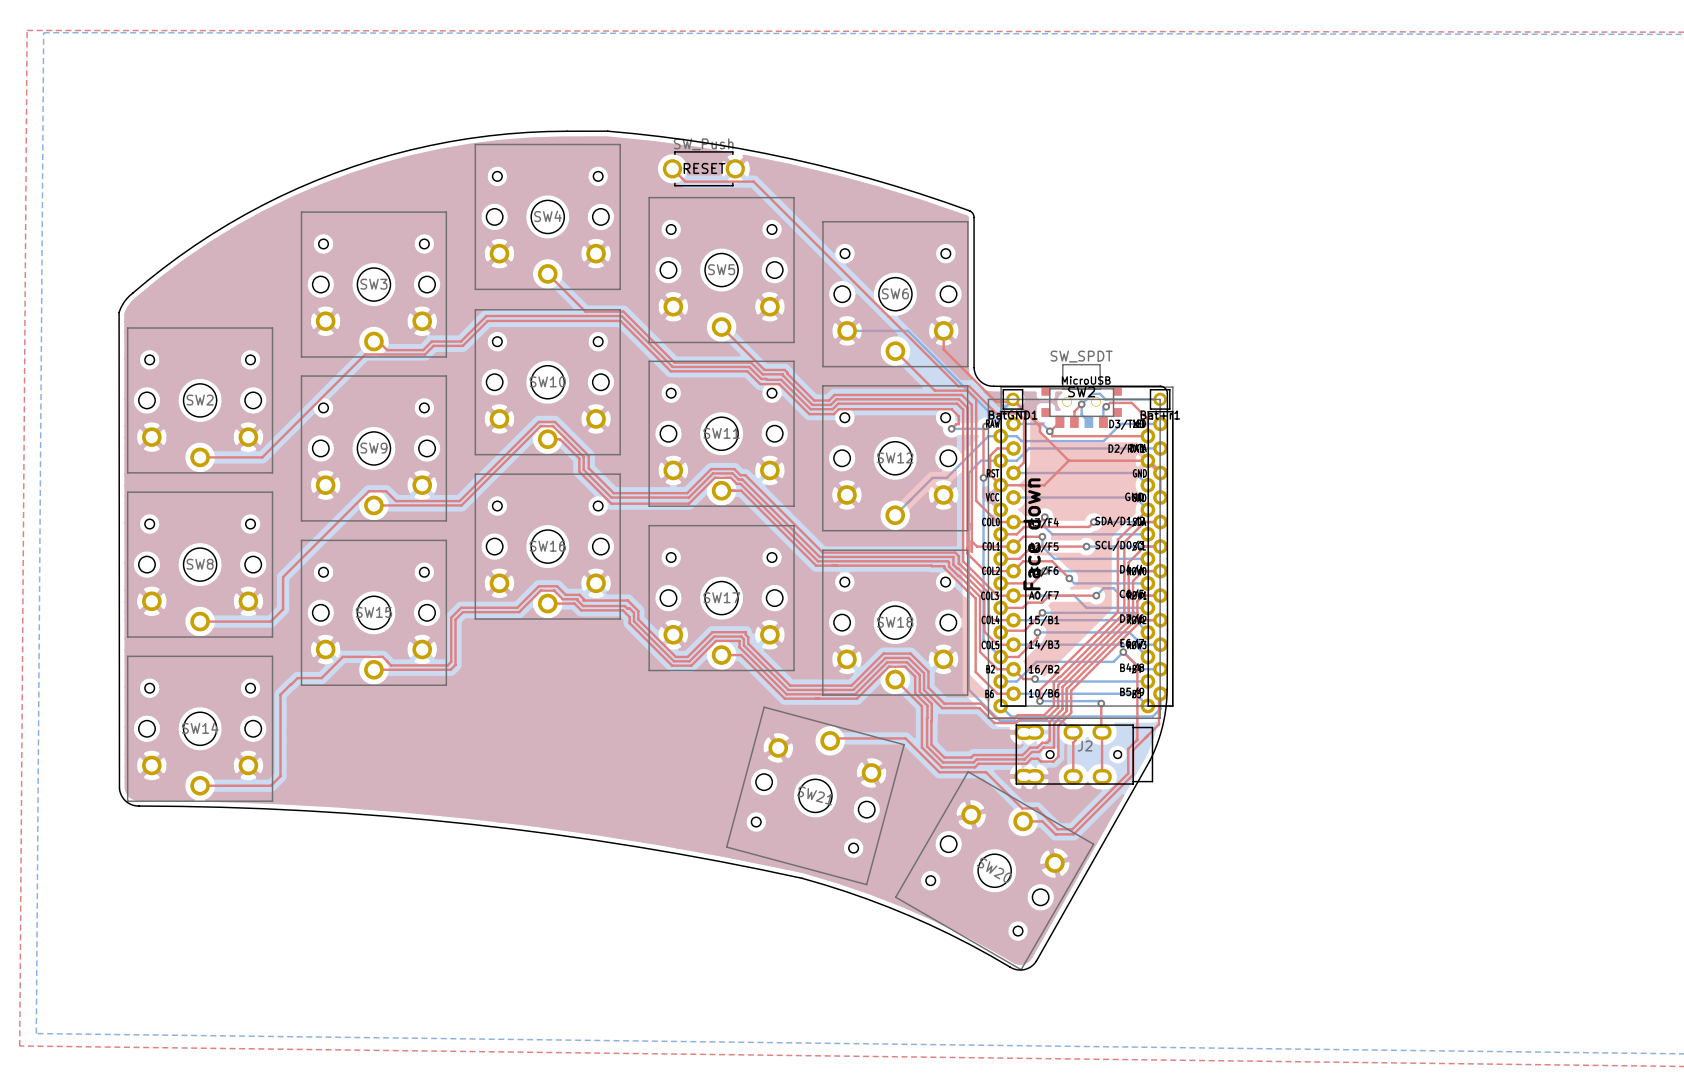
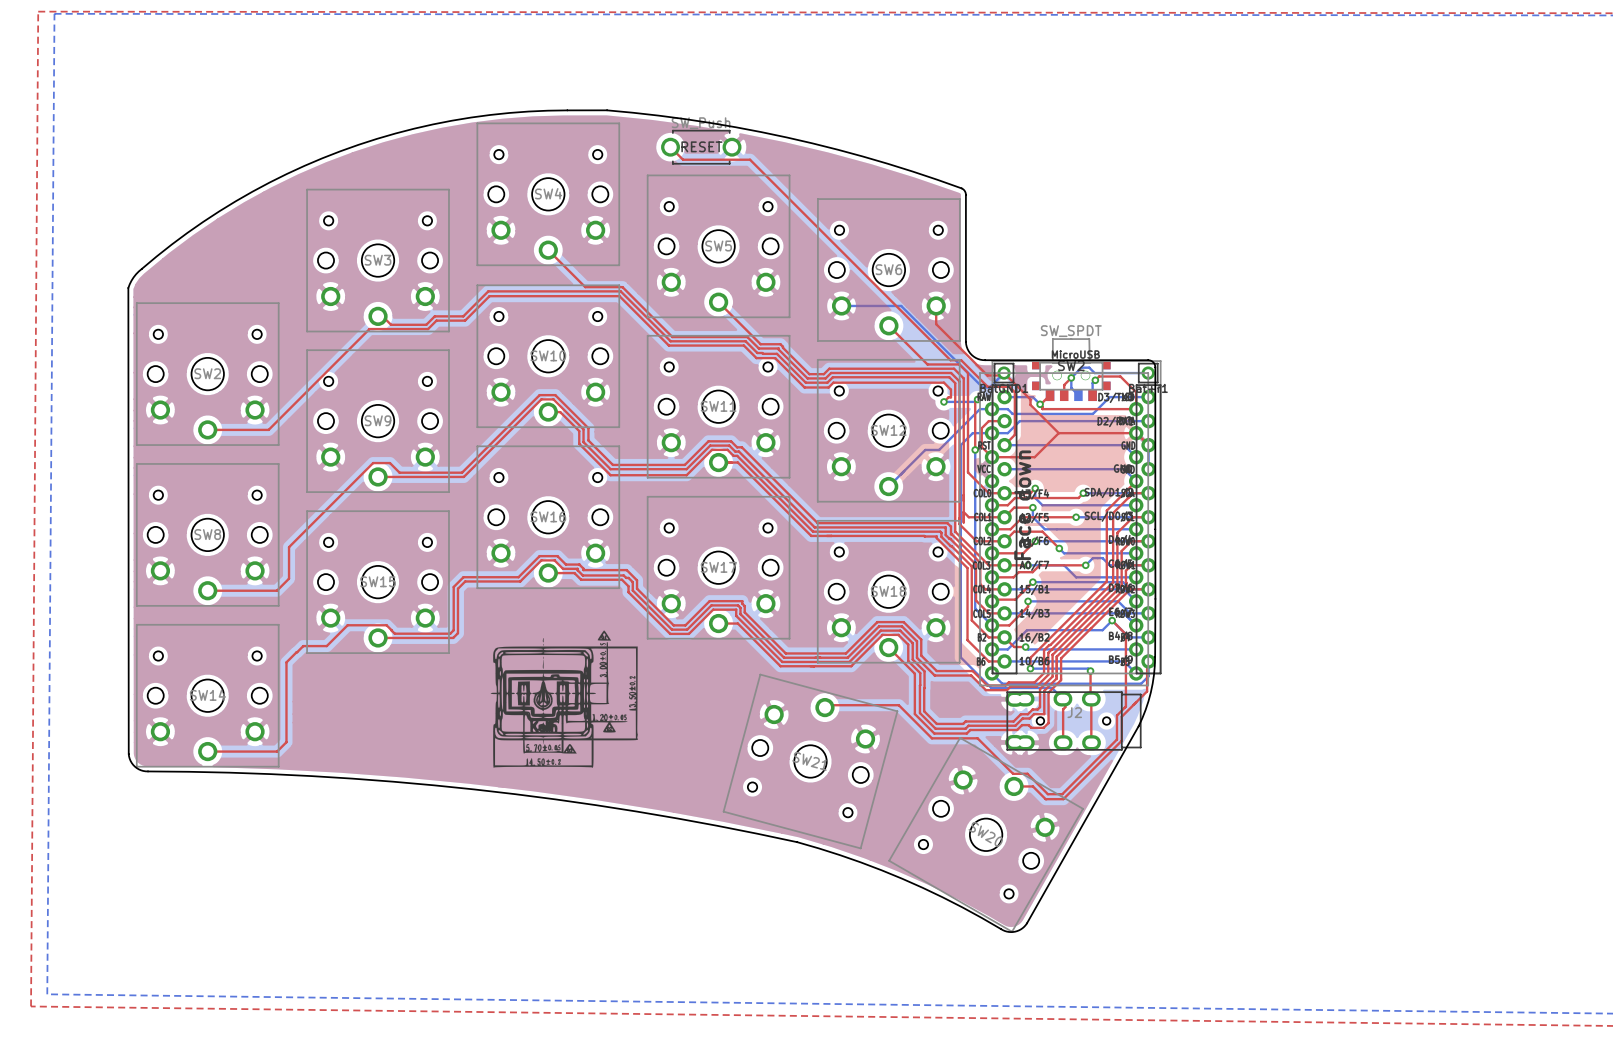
drawing: none -> [490, 630, 639, 768]

